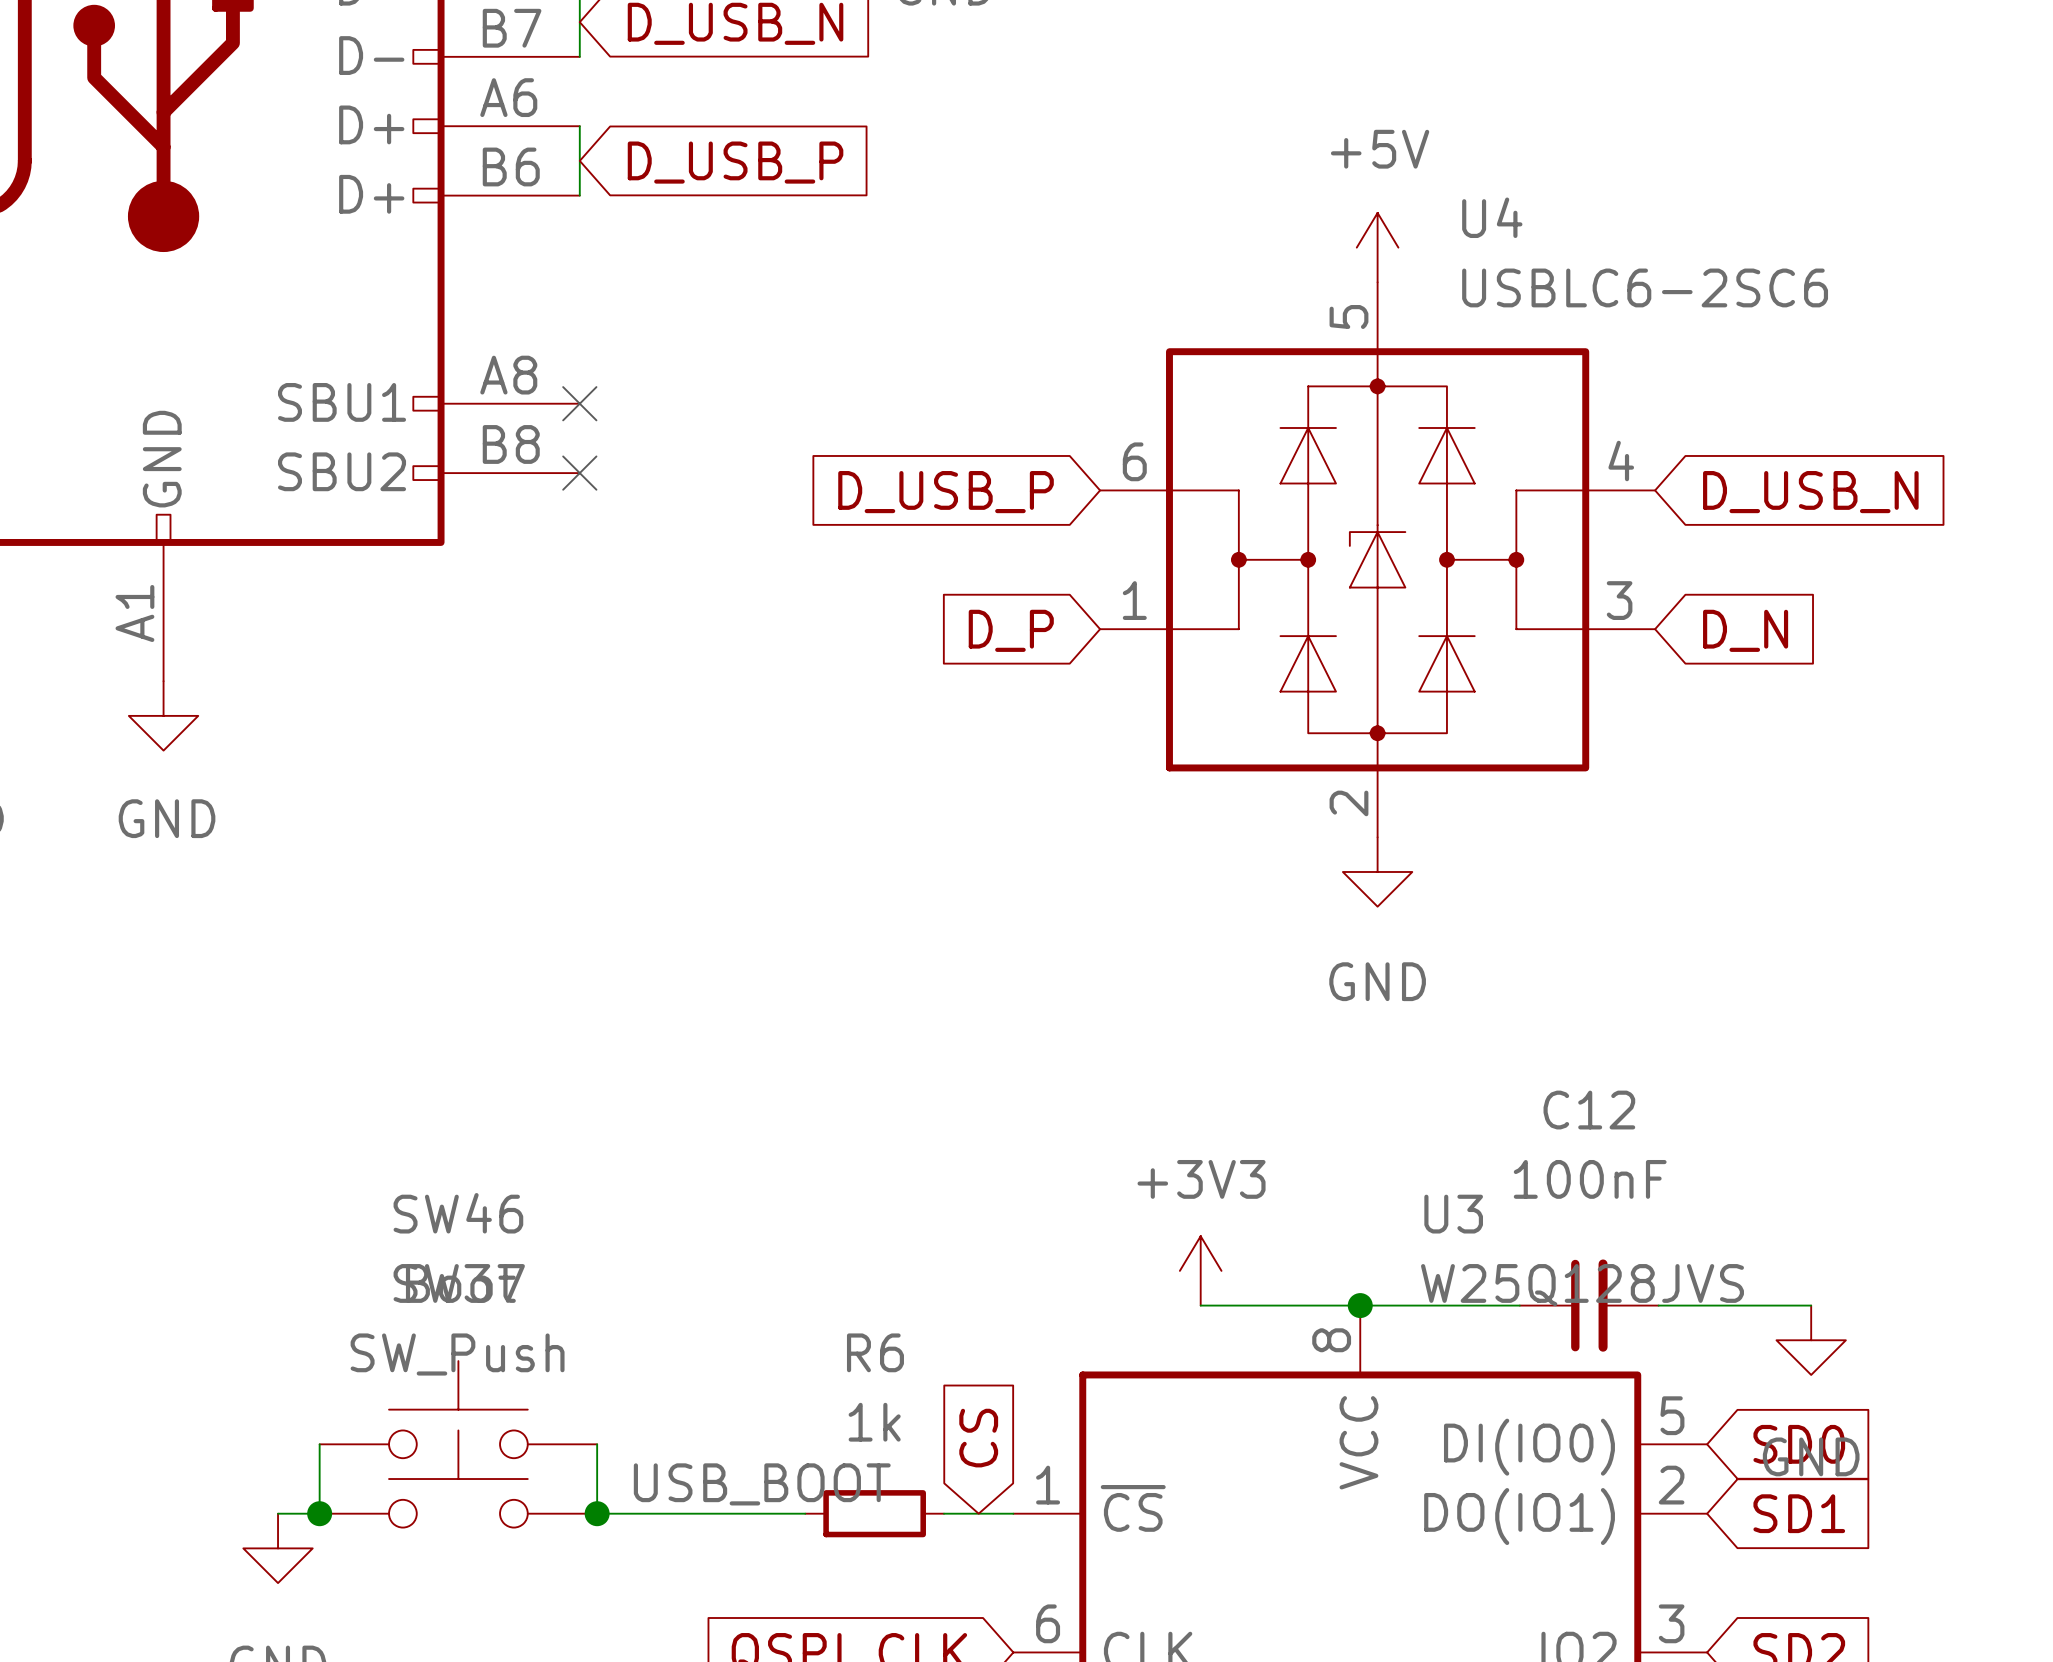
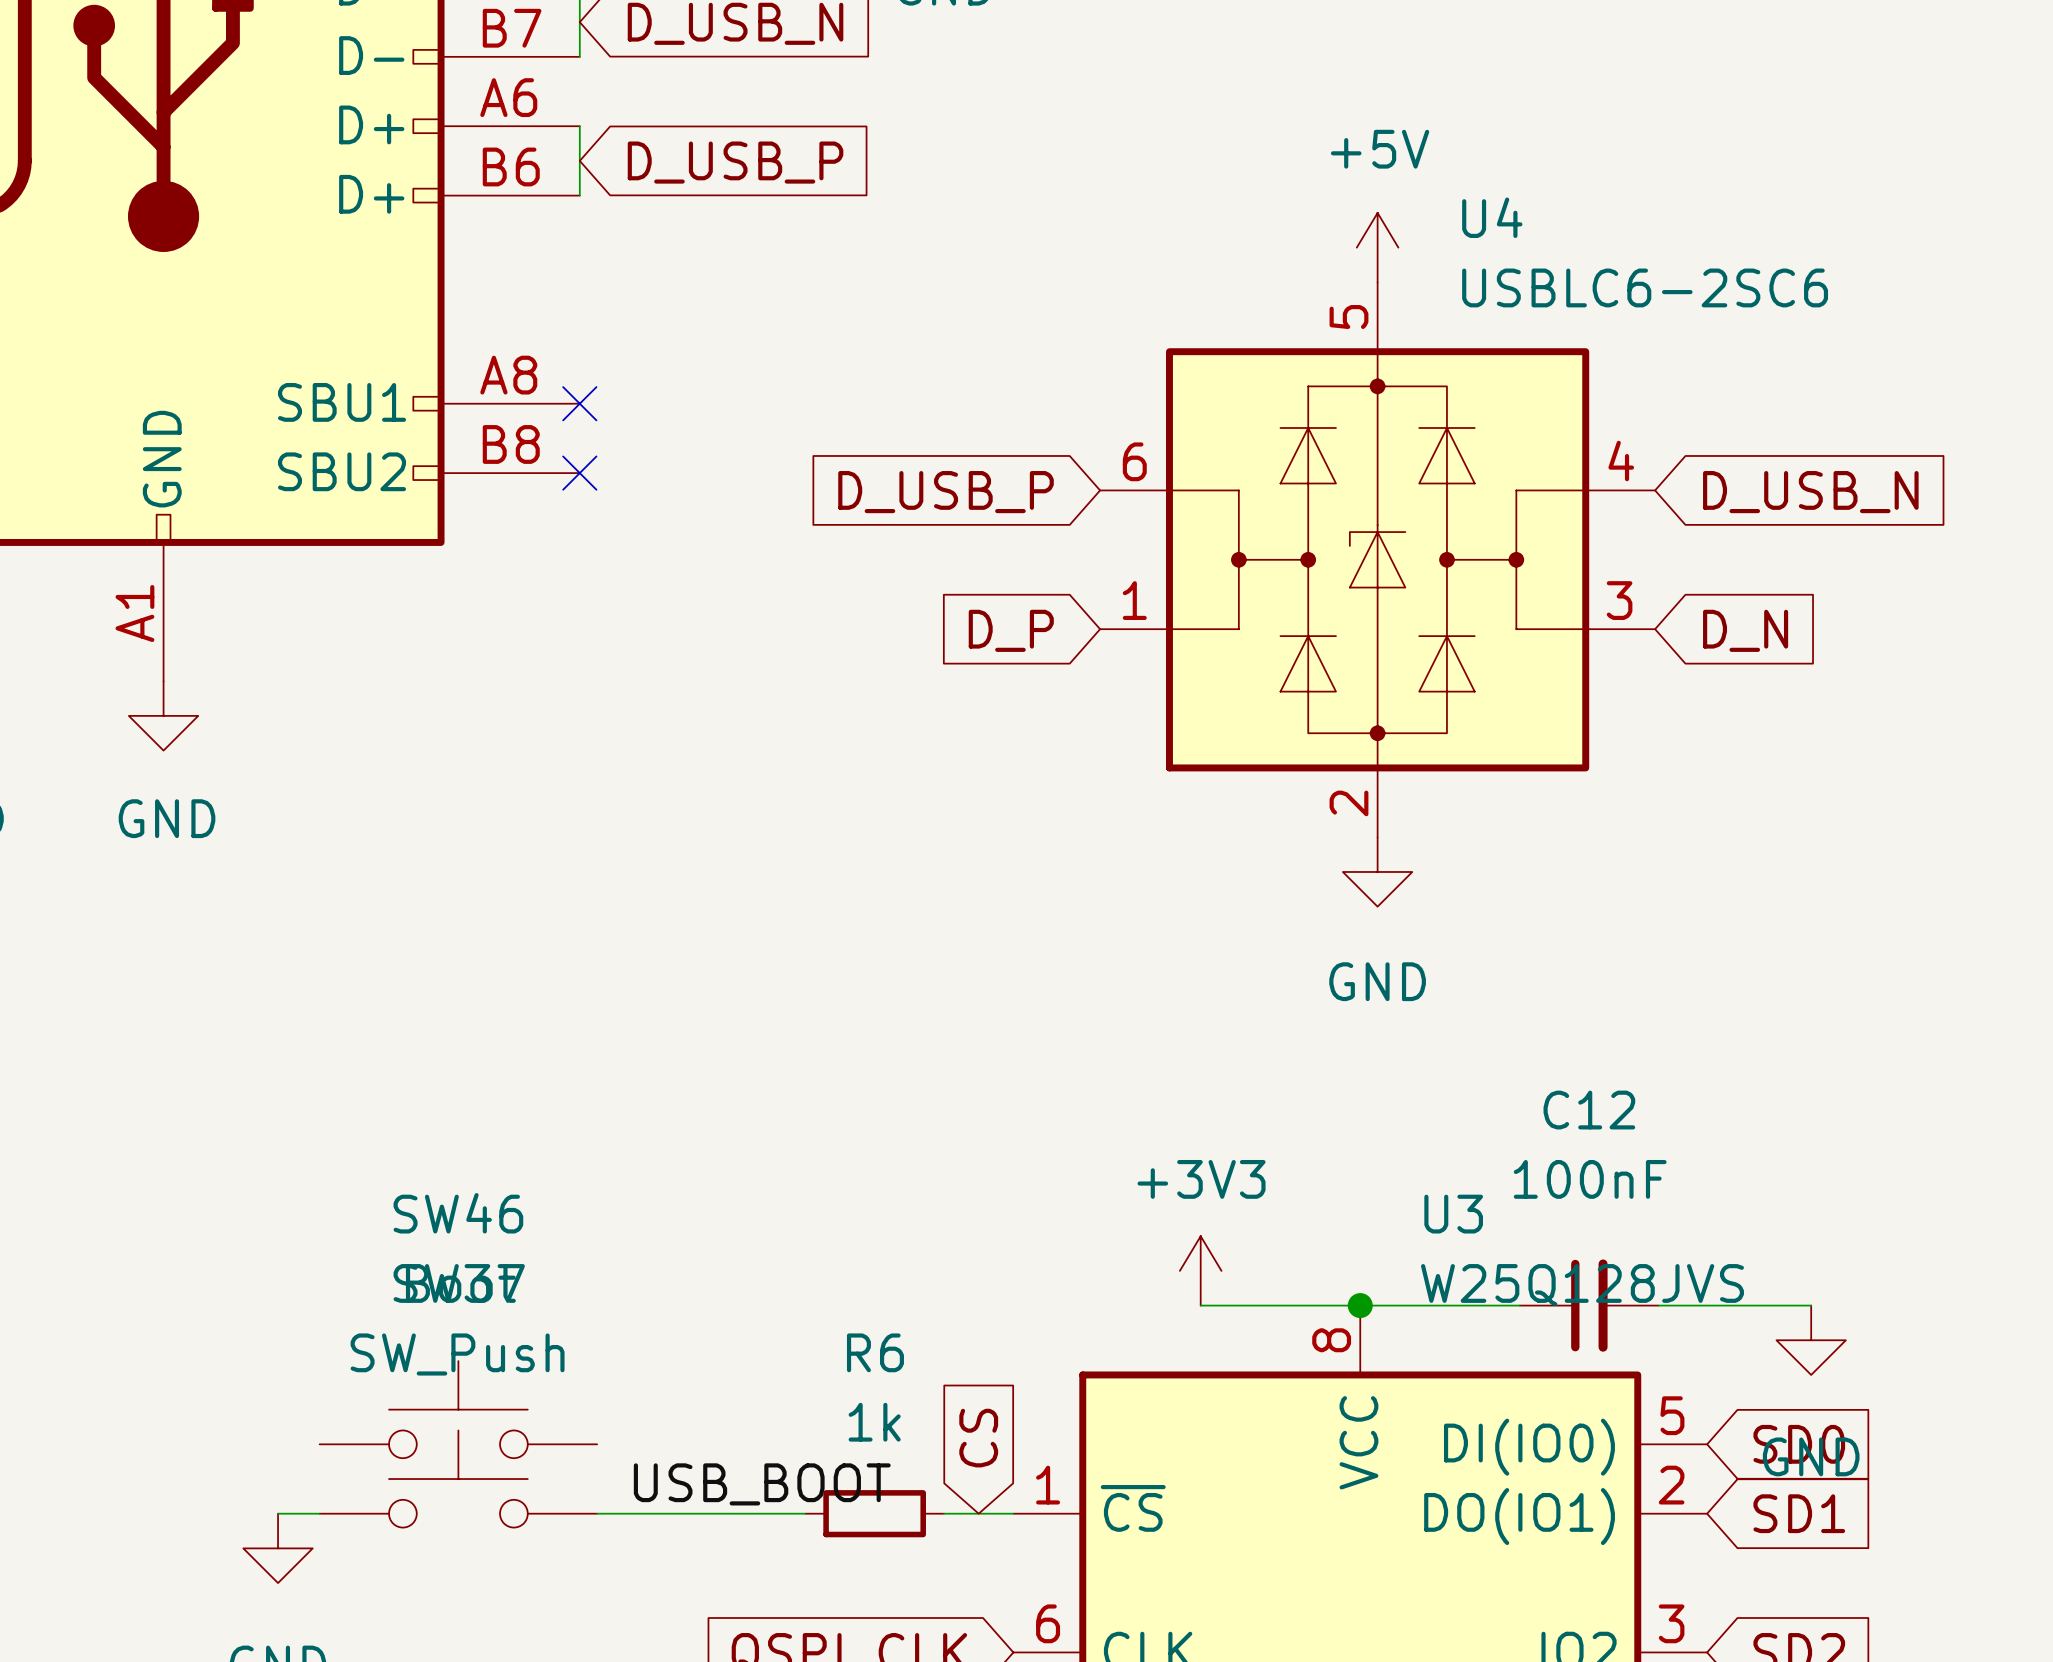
wire: (319, 1444) (319, 1513) -> none
wire: (597, 1444) (597, 1513) -> none
junction: (319, 1513) -> none
junction: (597, 1513) -> none

